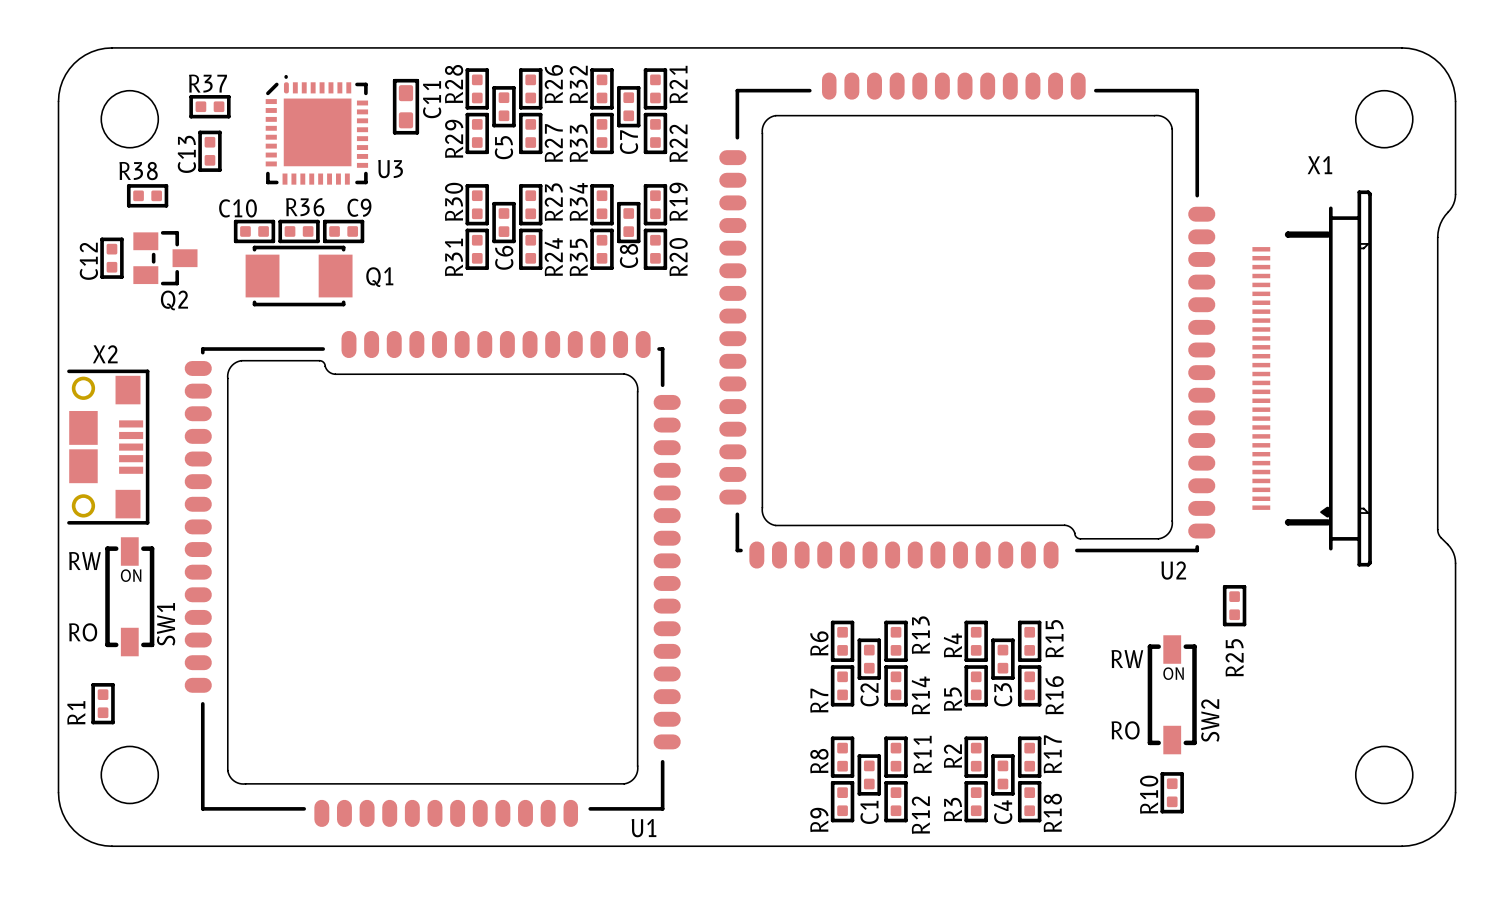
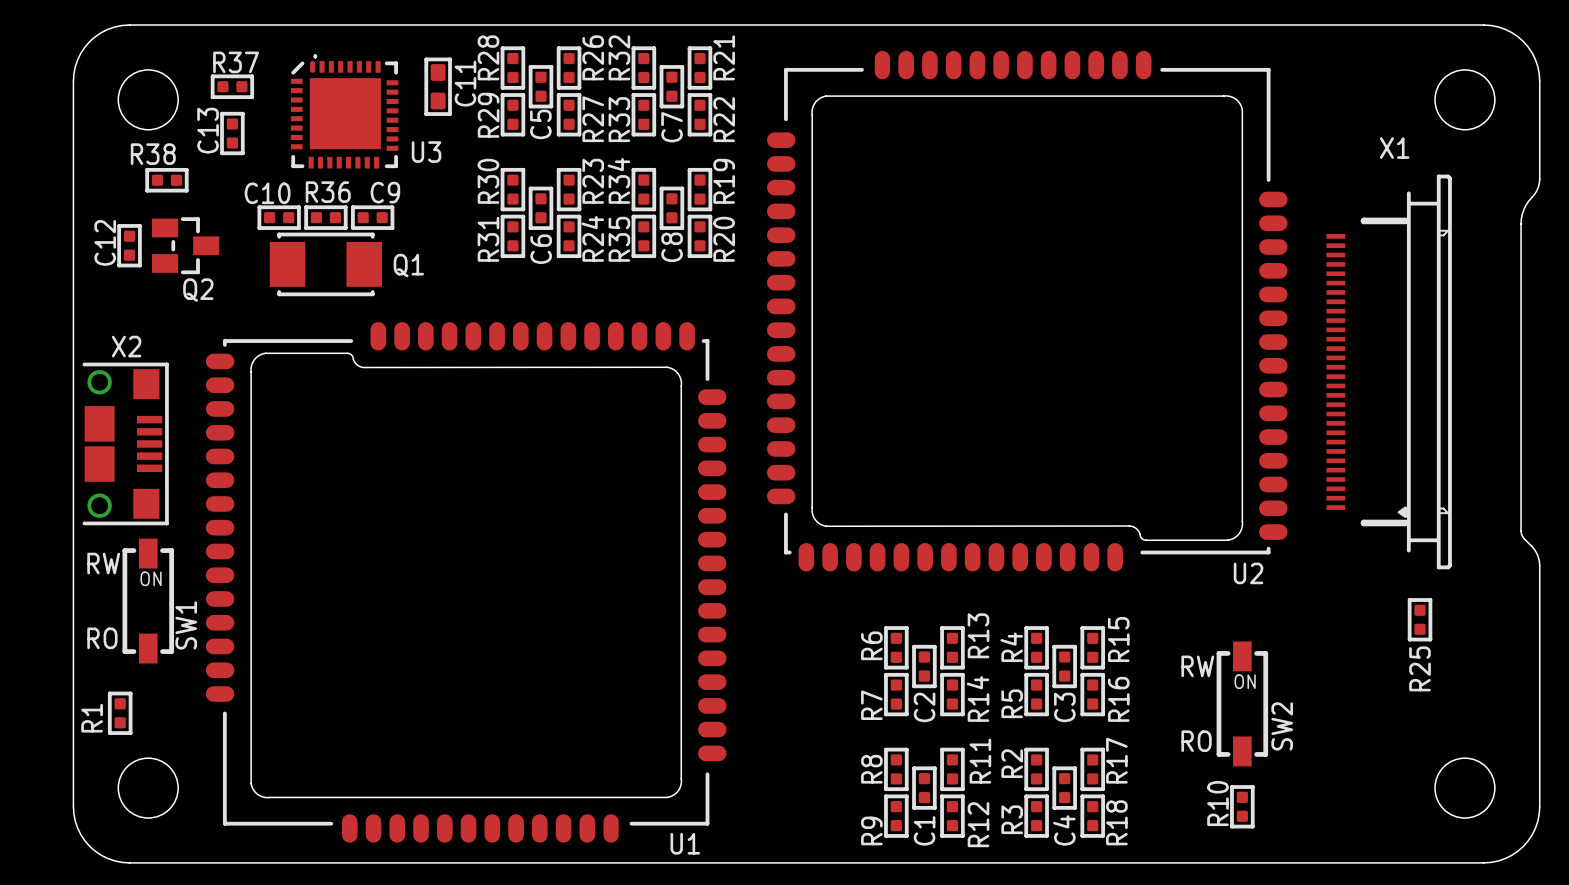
R25 position: (1234, 605) -> (1420, 619)

